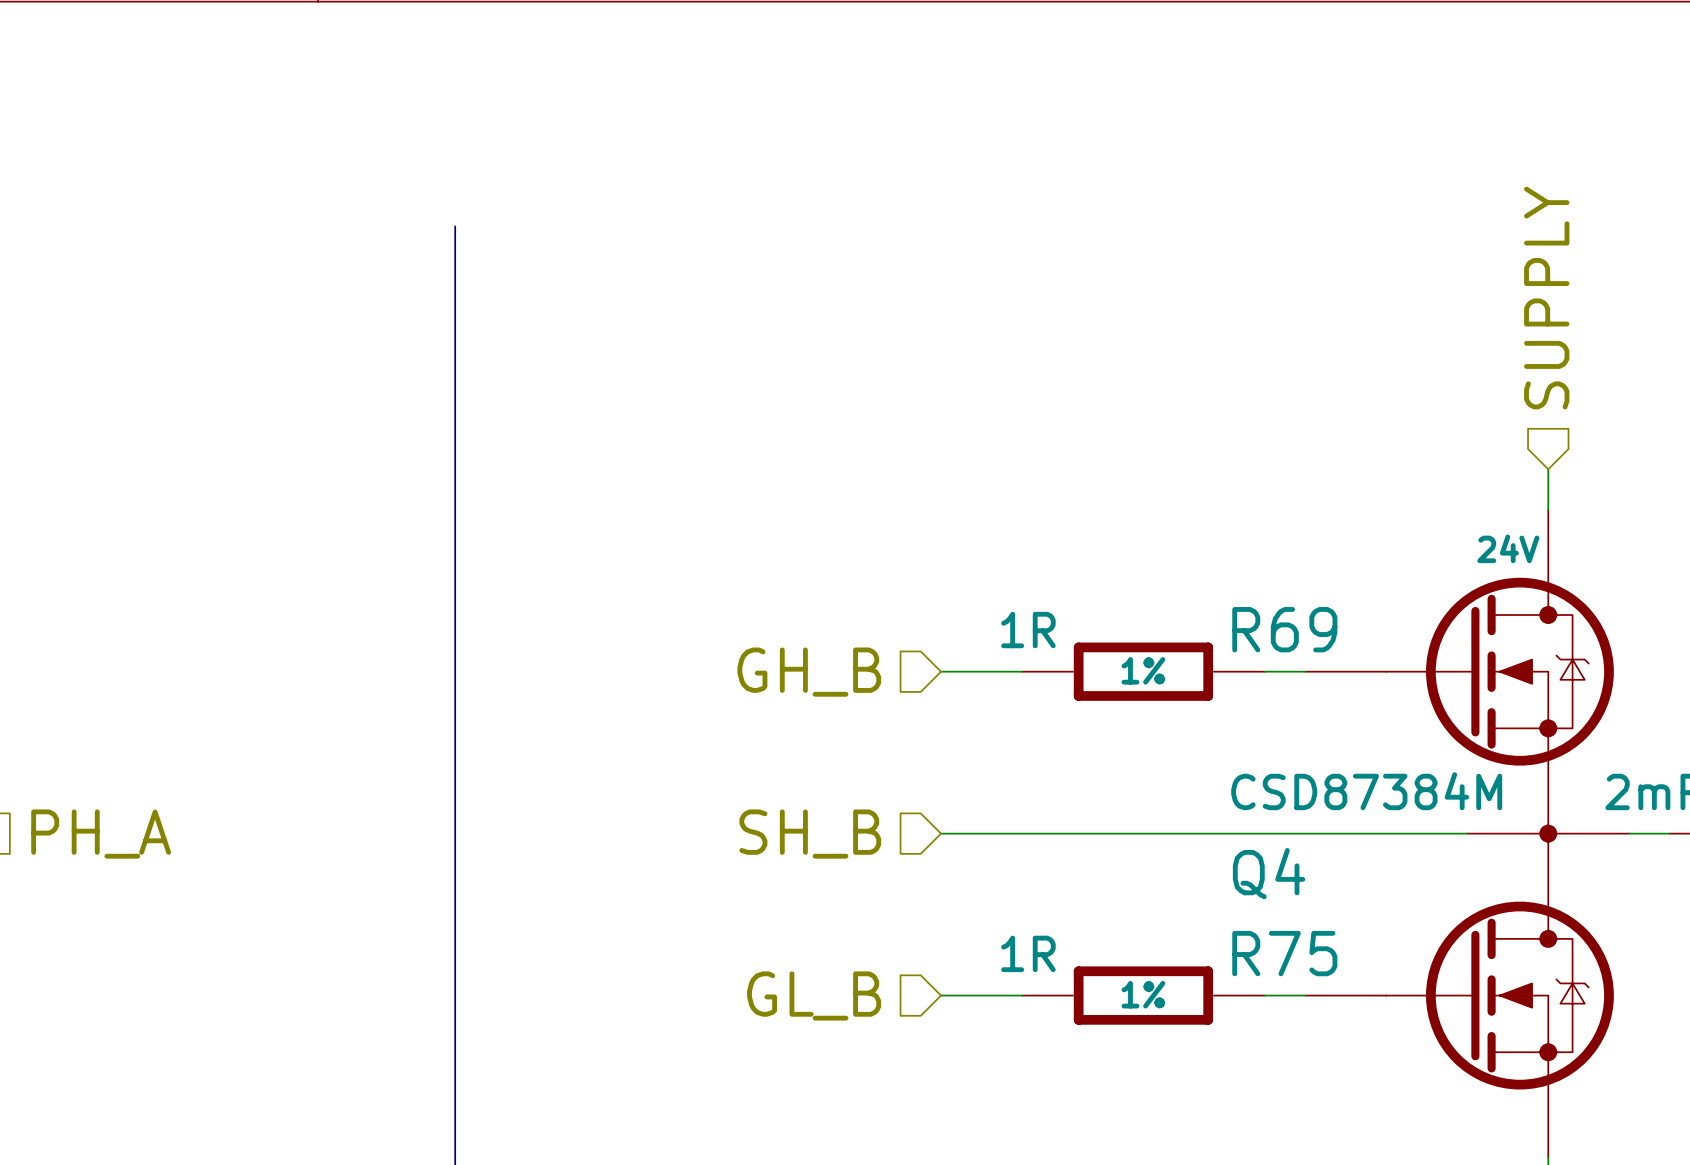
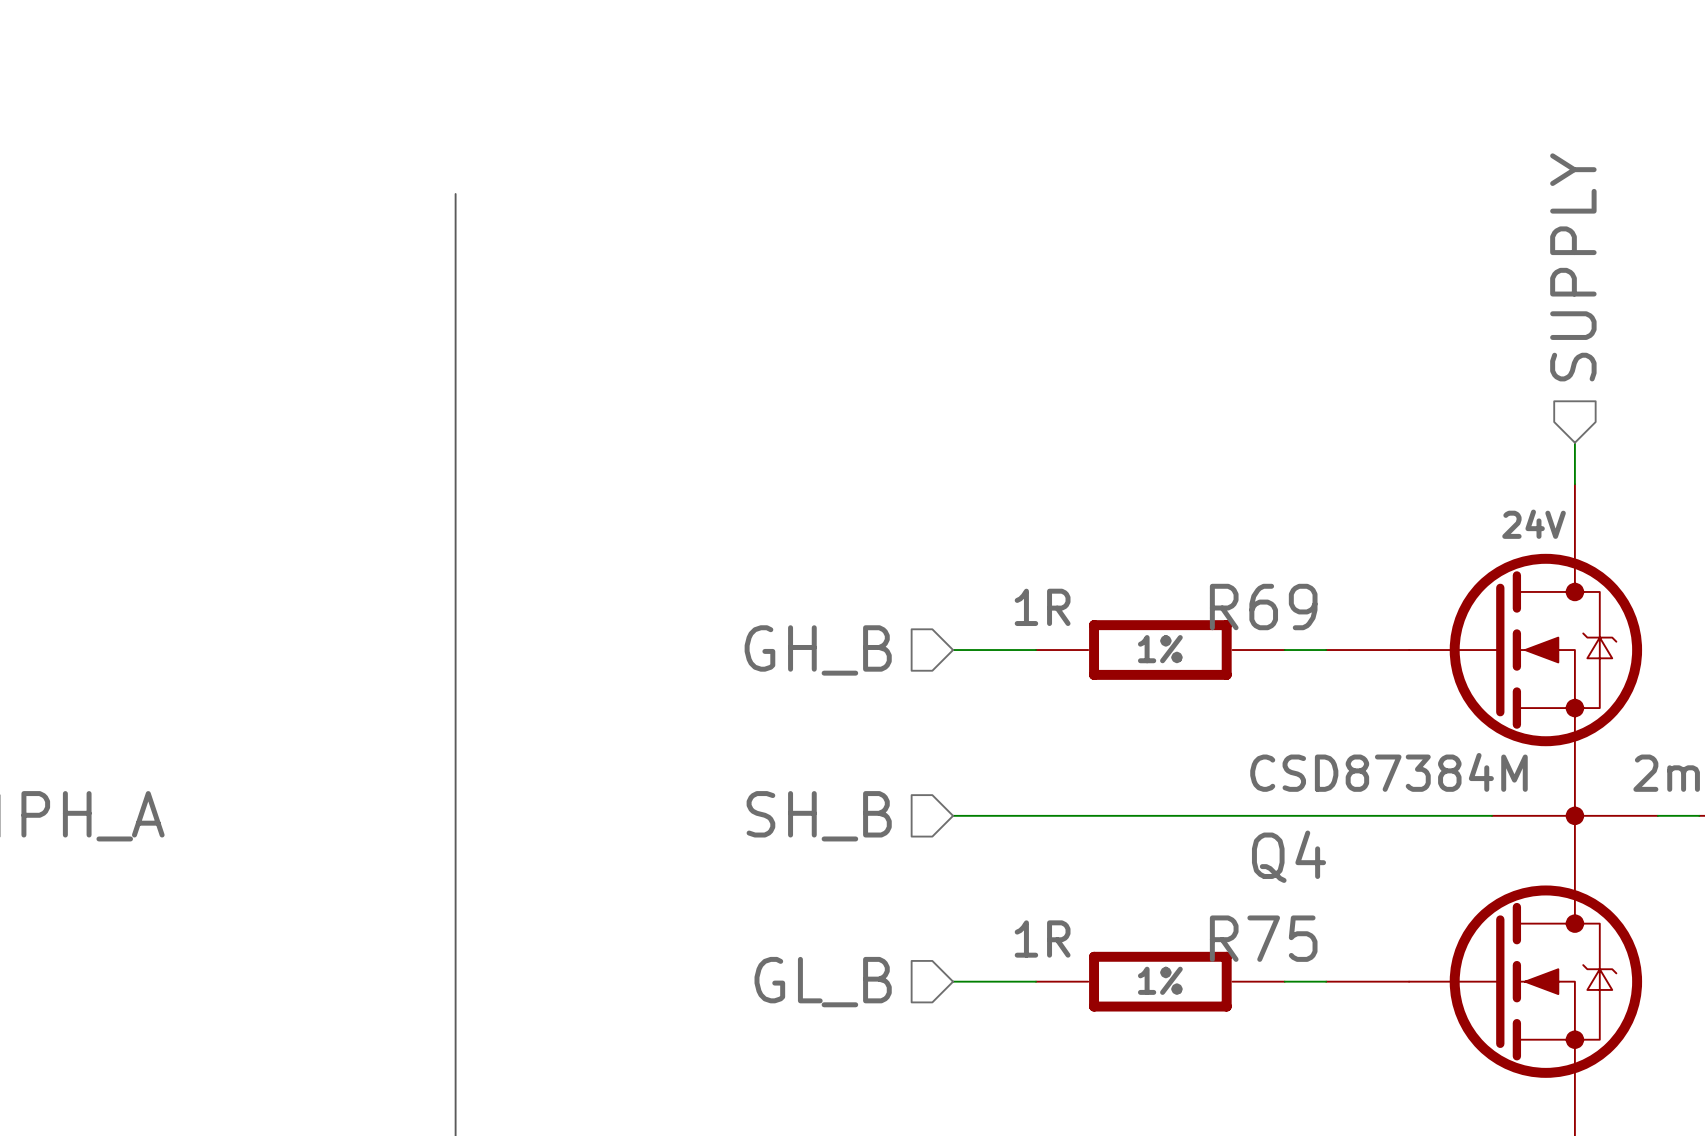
R69 name position: R69 (1284, 629) -> R69 (1263, 607)
R75 name position: R75 (1284, 953) -> R75 (1263, 938)

